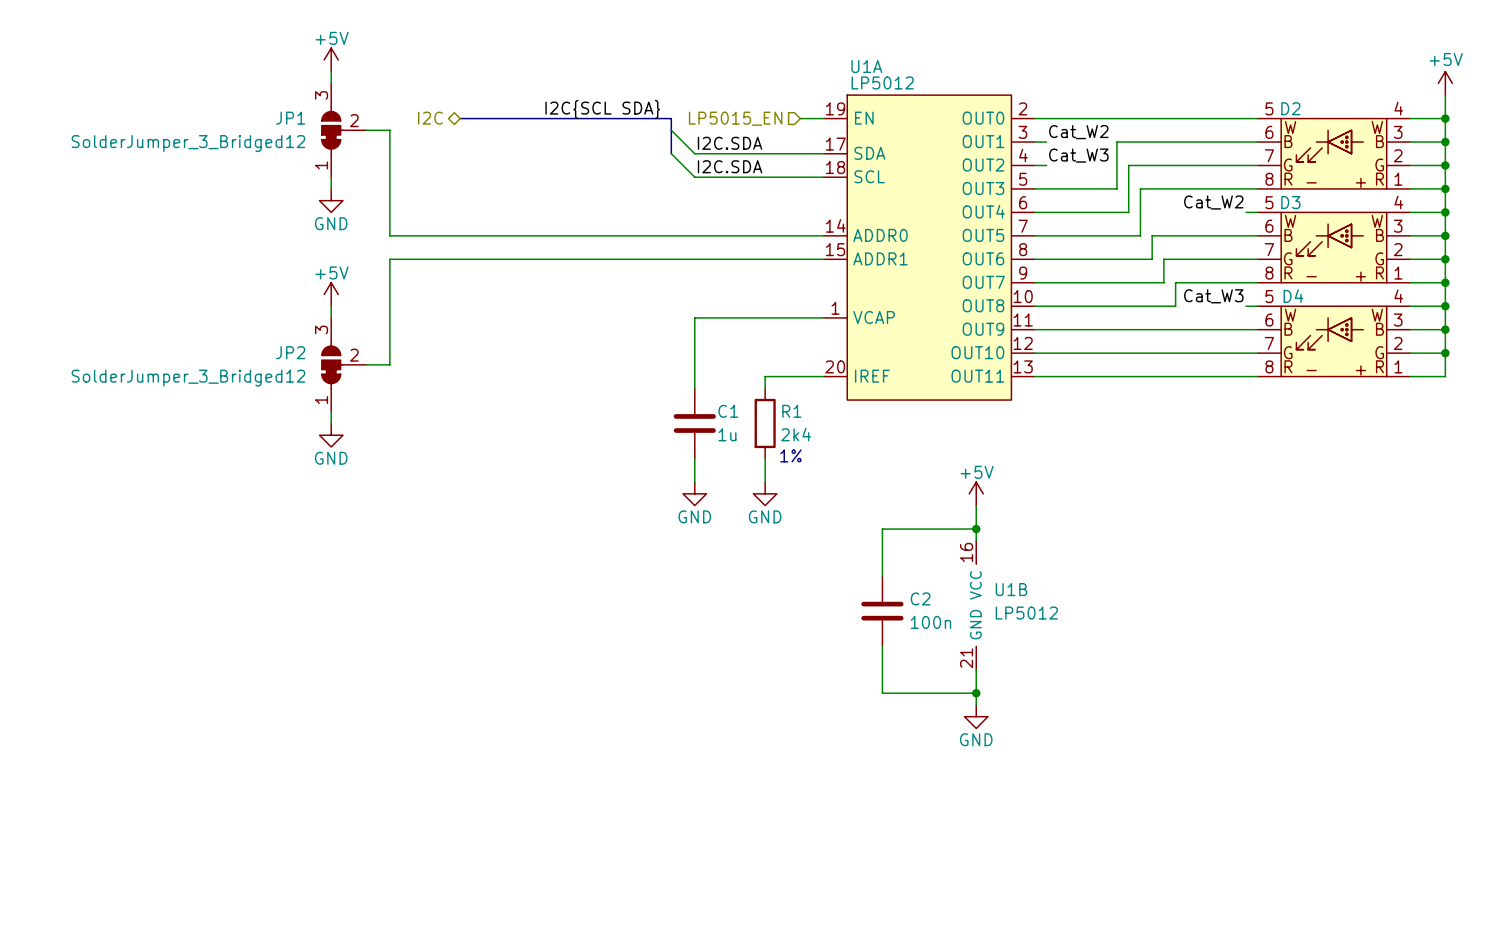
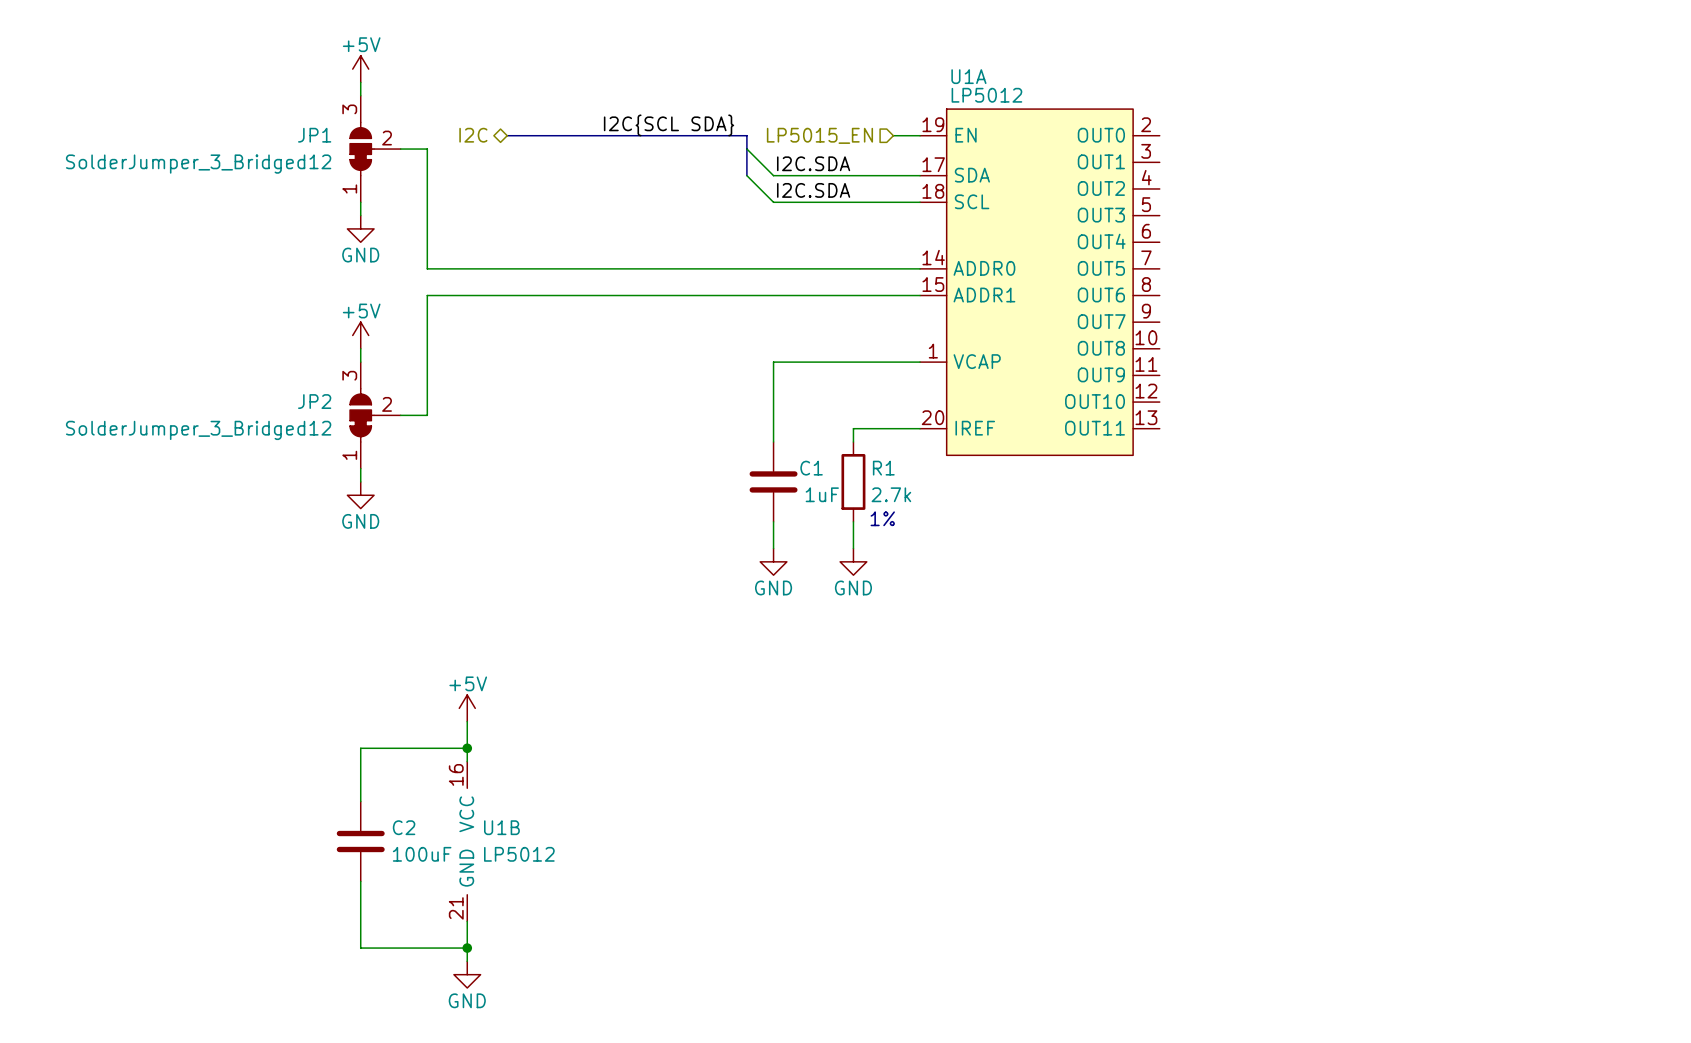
power symbol: +5V (1445, 83) -> none
wire: (1445, 95) (1445, 376) (1410, 376) -> none
wire: (1034, 118) (1257, 118) -> none
wire: (1410, 118) (1445, 118) -> none
junction: (1445, 118) -> none
label: Cat_W2 (1078, 132) -> none
wire: (1034, 142) (1046, 142) -> none
wire: (1257, 142) (1116, 142) (1116, 188) (1034, 188) -> none
wire: (1410, 142) (1445, 142) -> none
junction: (1445, 142) -> none
D2: (1333, 153) -> none
label: Cat_W3 (1078, 155) -> none
wire: (1034, 165) (1046, 165) -> none
wire: (1257, 165) (1128, 165) (1128, 212) (1034, 212) -> none
wire: (1410, 165) (1445, 165) -> none
junction: (1445, 165) -> none
wire: (1257, 188) (1140, 188) (1140, 235) (1034, 235) -> none
wire: (1410, 188) (1445, 188) -> none
junction: (1445, 188) -> none
label: Cat_W2 (1213, 202) -> none
wire: (1245, 212) (1257, 212) -> none
wire: (1410, 212) (1445, 212) -> none
junction: (1445, 212) -> none
wire: (1257, 235) (1152, 235) (1152, 259) (1034, 259) -> none
wire: (1410, 235) (1445, 235) -> none
junction: (1445, 235) -> none
D3: (1333, 247) -> none
wire: (1257, 259) (1163, 259) (1163, 282) (1034, 282) -> none
wire: (1410, 259) (1445, 259) -> none
junction: (1445, 259) -> none
wire: (1257, 282) (1175, 282) (1175, 306) (1034, 306) -> none
wire: (1410, 282) (1445, 282) -> none
junction: (1445, 282) -> none
label: Cat_W3 (1213, 296) -> none
wire: (1245, 306) (1257, 306) -> none
wire: (1410, 306) (1445, 306) -> none
junction: (1445, 306) -> none
wire: (1034, 329) (1257, 329) -> none
wire: (1410, 329) (1445, 329) -> none
junction: (1445, 329) -> none
D4: (1333, 341) -> none
wire: (1034, 353) (1257, 353) -> none
wire: (1410, 353) (1445, 353) -> none
junction: (1445, 353) -> none
wire: (1034, 376) (1257, 376) -> none
C1 value: 1u (727, 434) -> 1uF (822, 494)
R1 value: 2k4 (796, 434) -> 2.7k (891, 494)
power symbol: +5V (976, 493) -> none
wire: (976, 505) (976, 540) -> none
wire: (976, 529) (882, 529) (882, 575) -> none
junction: (976, 529) -> none
U1B symbol: [976, 540, 977, 670] -> [467, 761, 468, 922]
C2 position: (882, 611) -> (360, 841)
power symbol: none -> +5V (467, 708)
C2 value: 100n (930, 622) -> 100uF (422, 854)
wire: none -> (467, 721) (467, 761)
wire: (882, 646) (882, 693) (976, 693) -> none
wire: none -> (467, 748) (360, 748) (360, 801)
junction: none -> (467, 748)
wire: (976, 669) (976, 704) -> none
junction: (976, 693) -> none
power symbol: GND (976, 716) -> none
wire: none -> (360, 881) (360, 948) (467, 948)
wire: none -> (467, 921) (467, 961)
junction: none -> (467, 948)
power symbol: none -> GND (467, 974)

